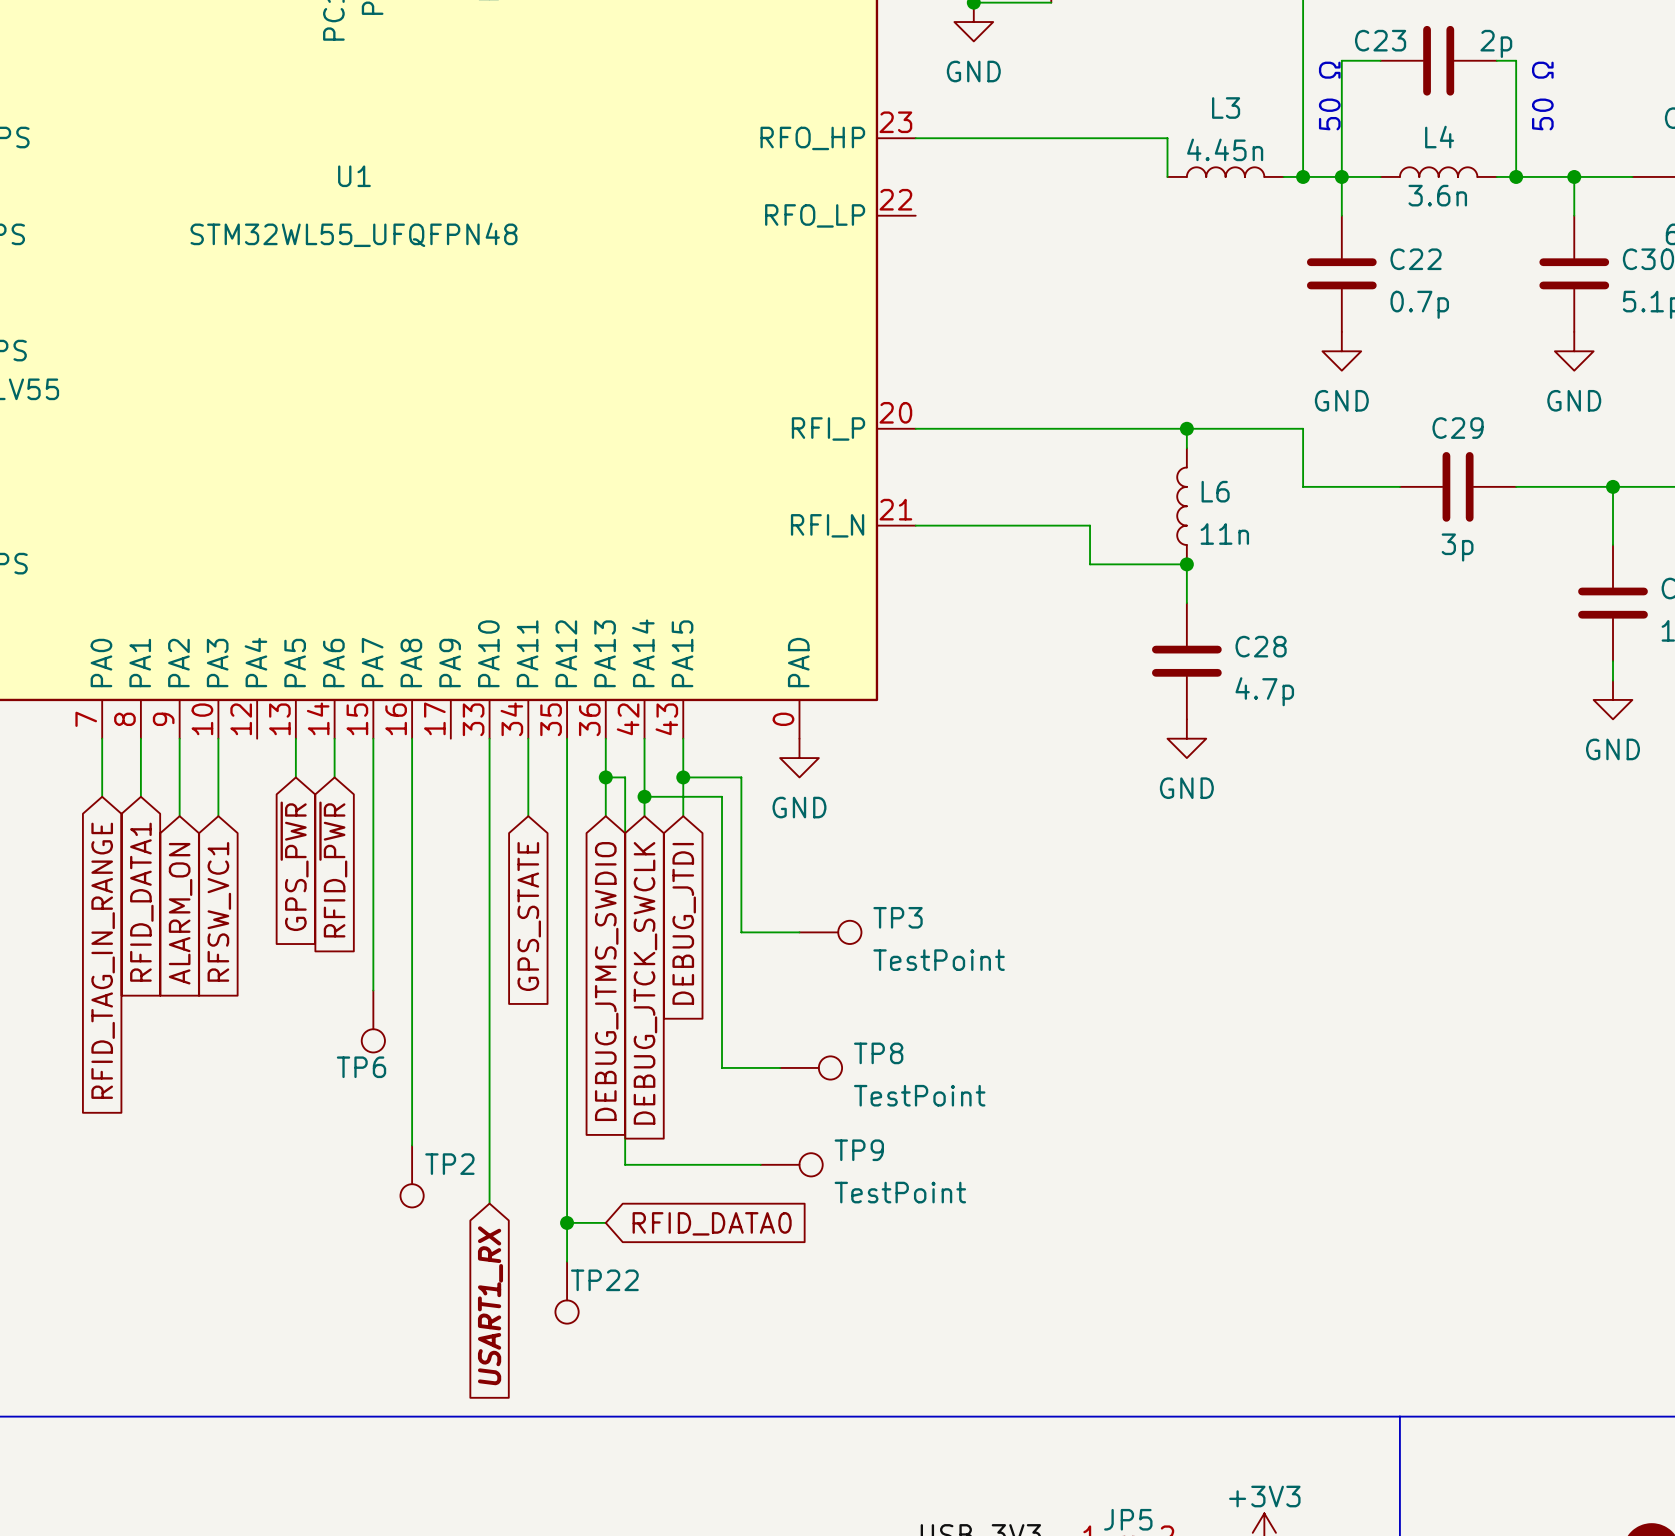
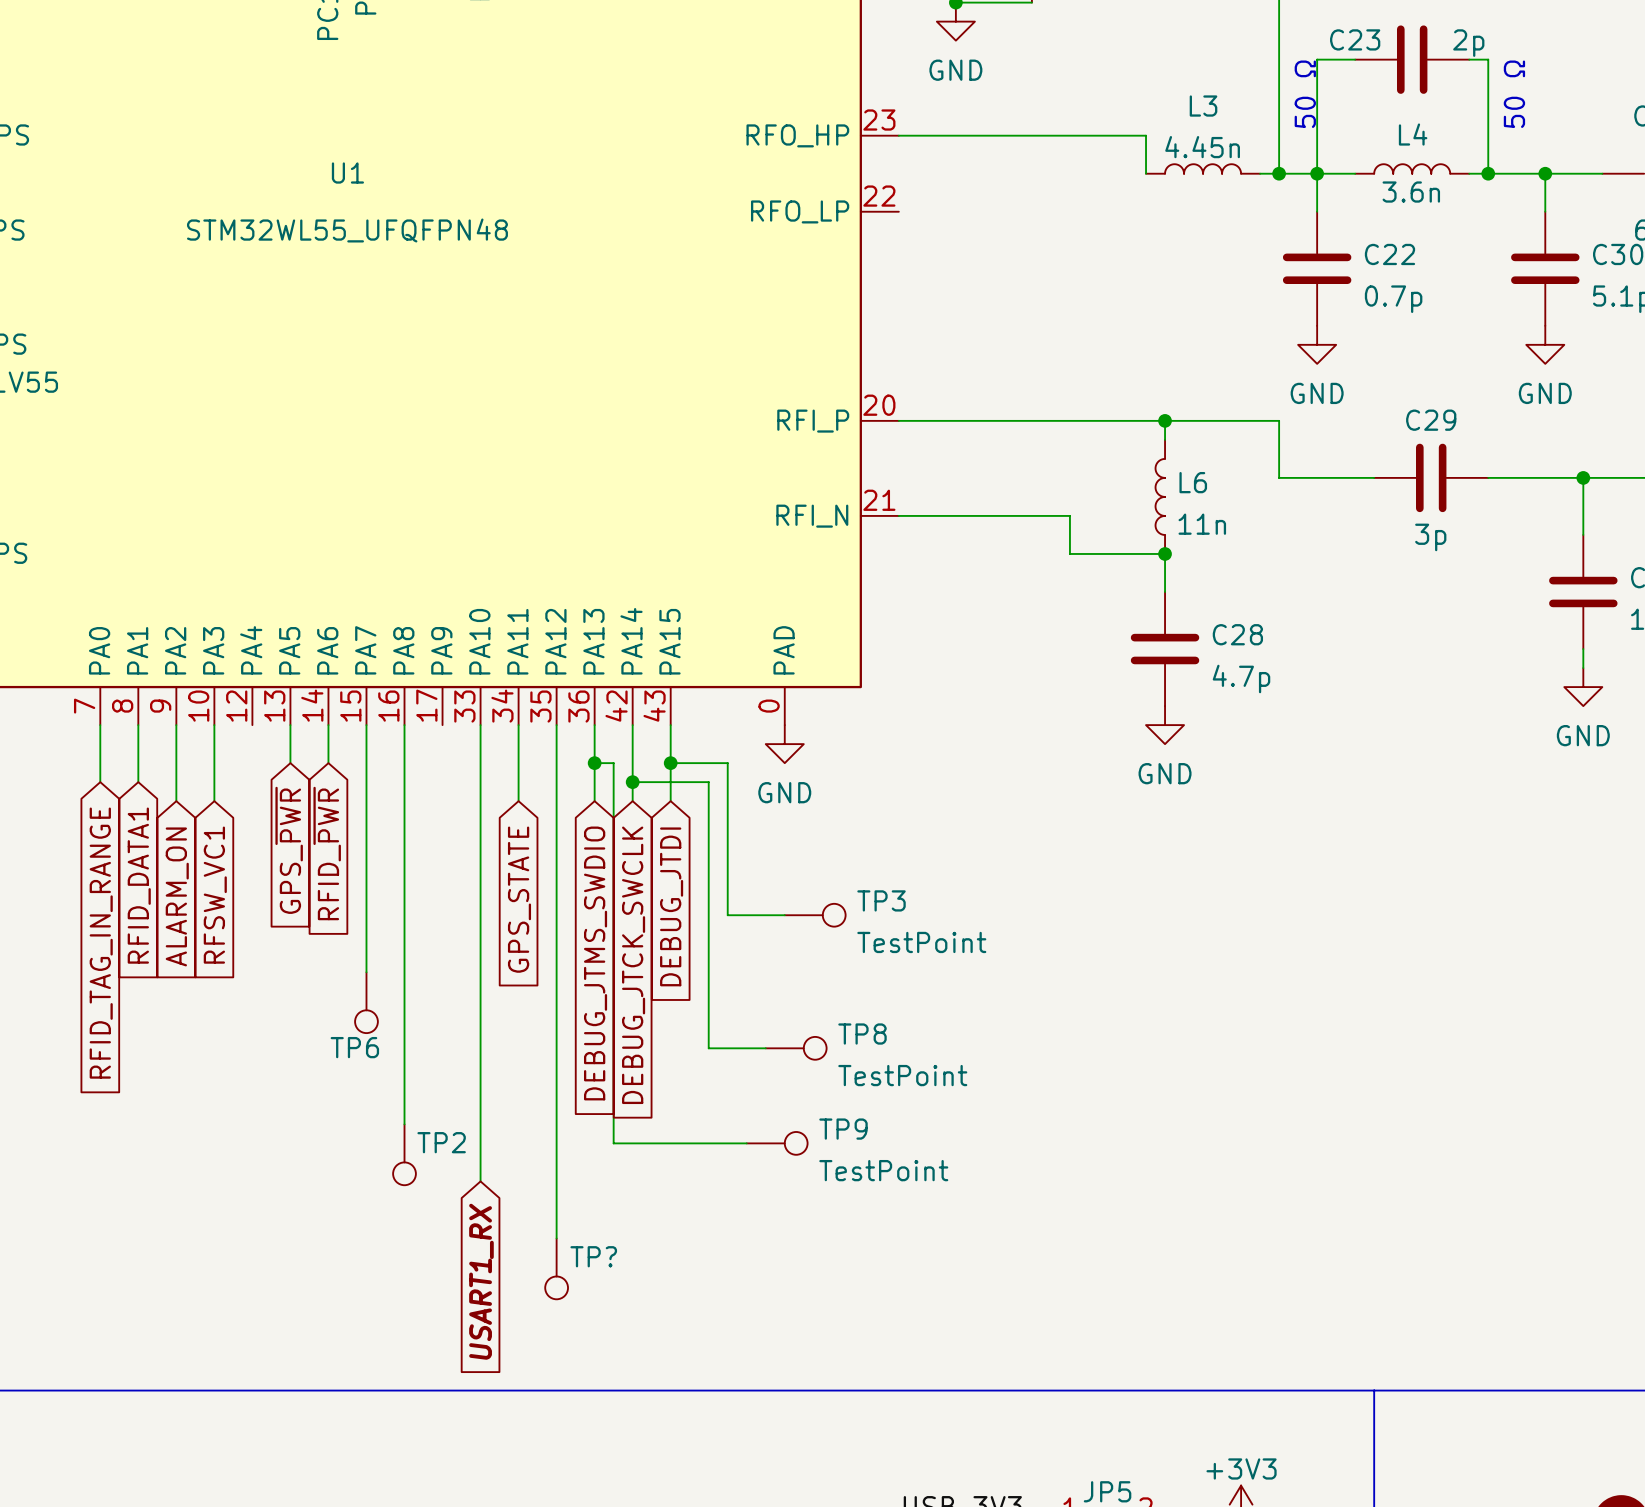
wire: (567, 1222) (605, 1222) -> none
junction: (567, 1222) -> none
global label: RFID_DATA0 (712, 1223) -> none
TP22 name: TP22 (604, 1280) -> TP? (593, 1256)

